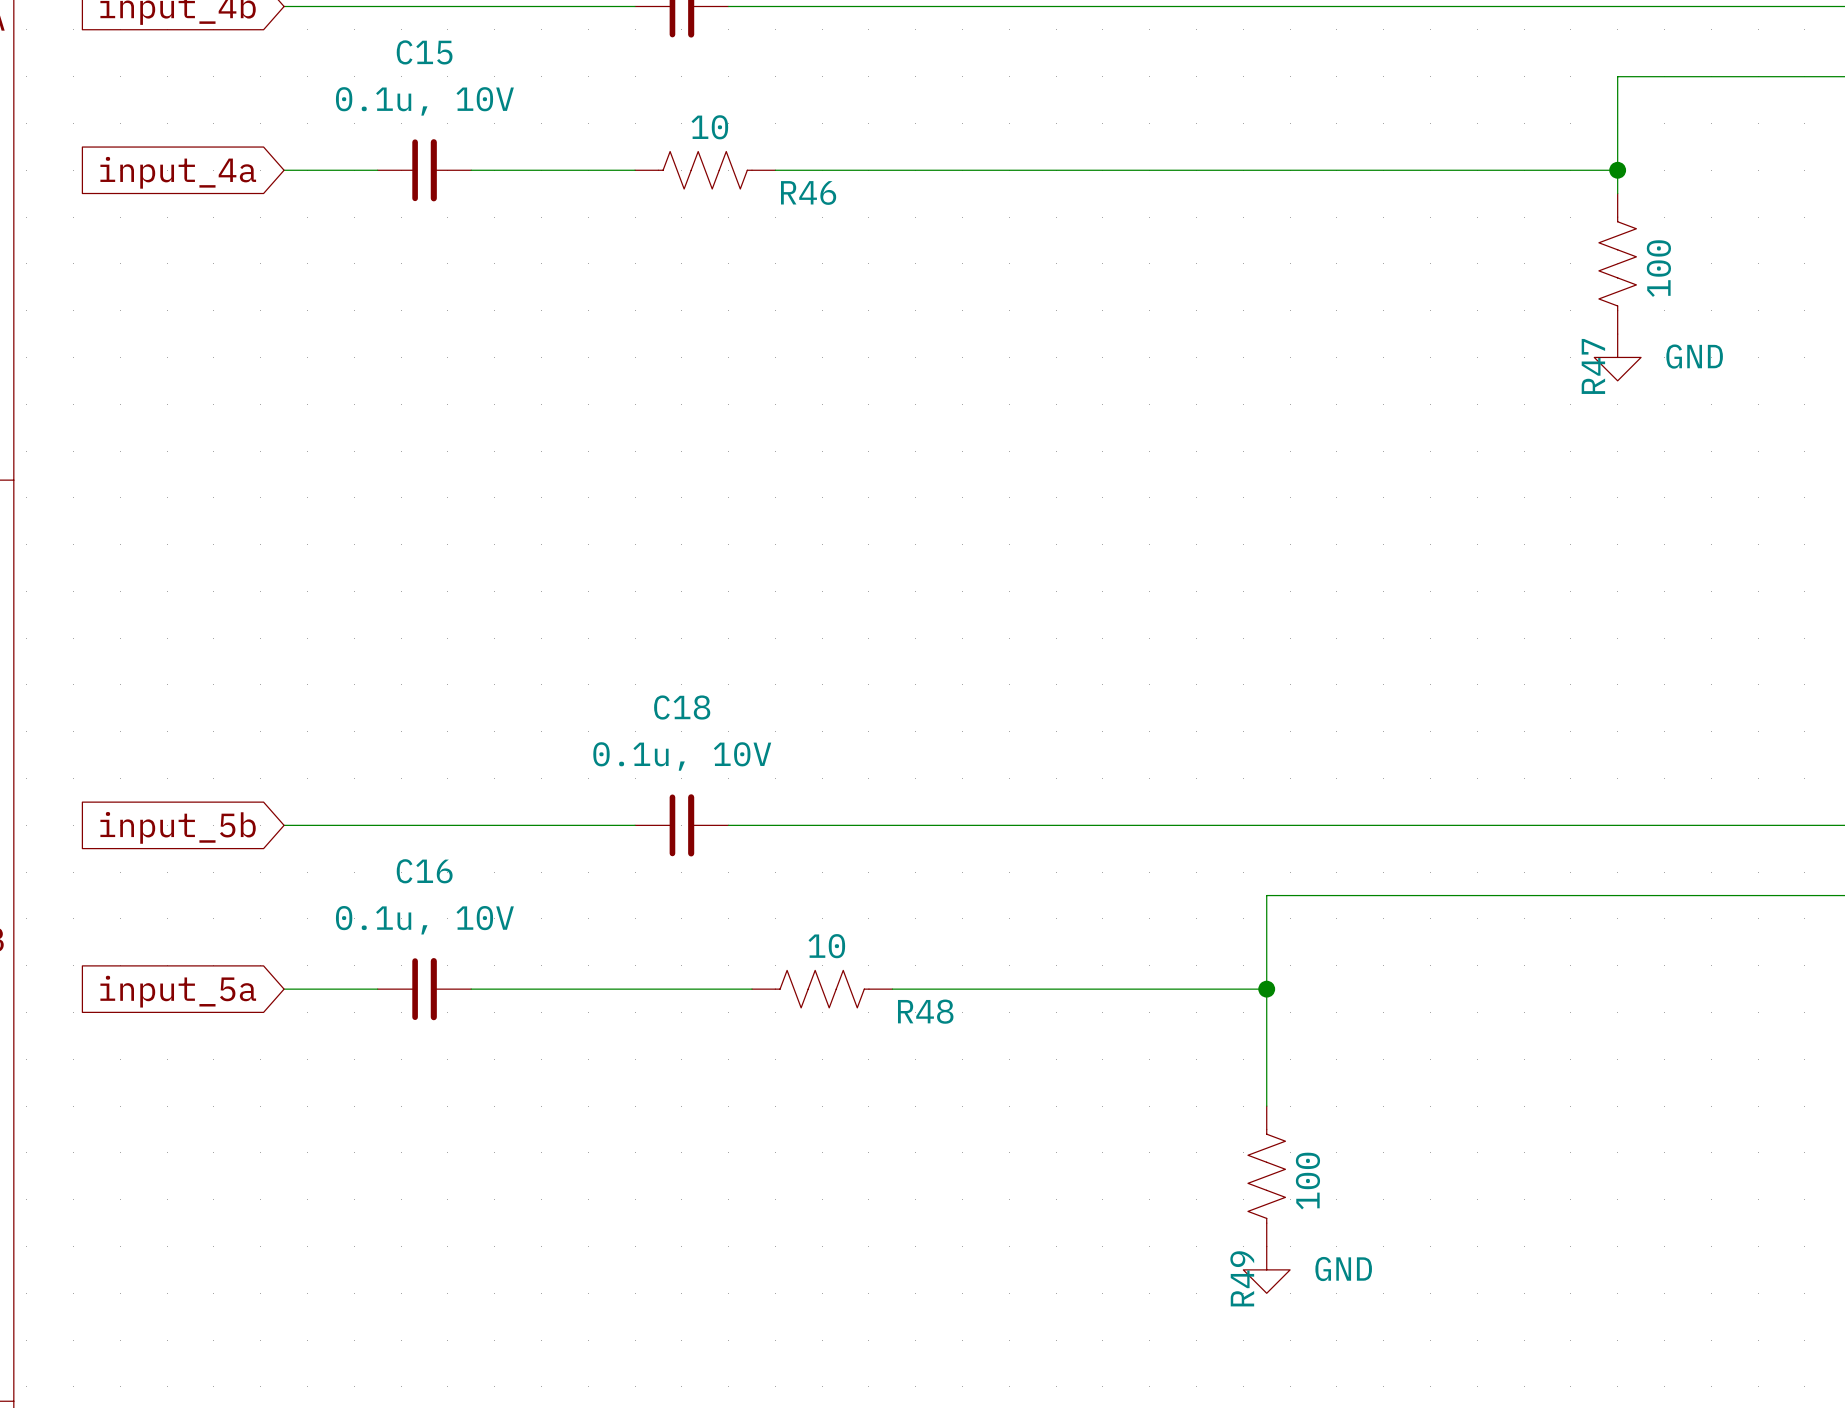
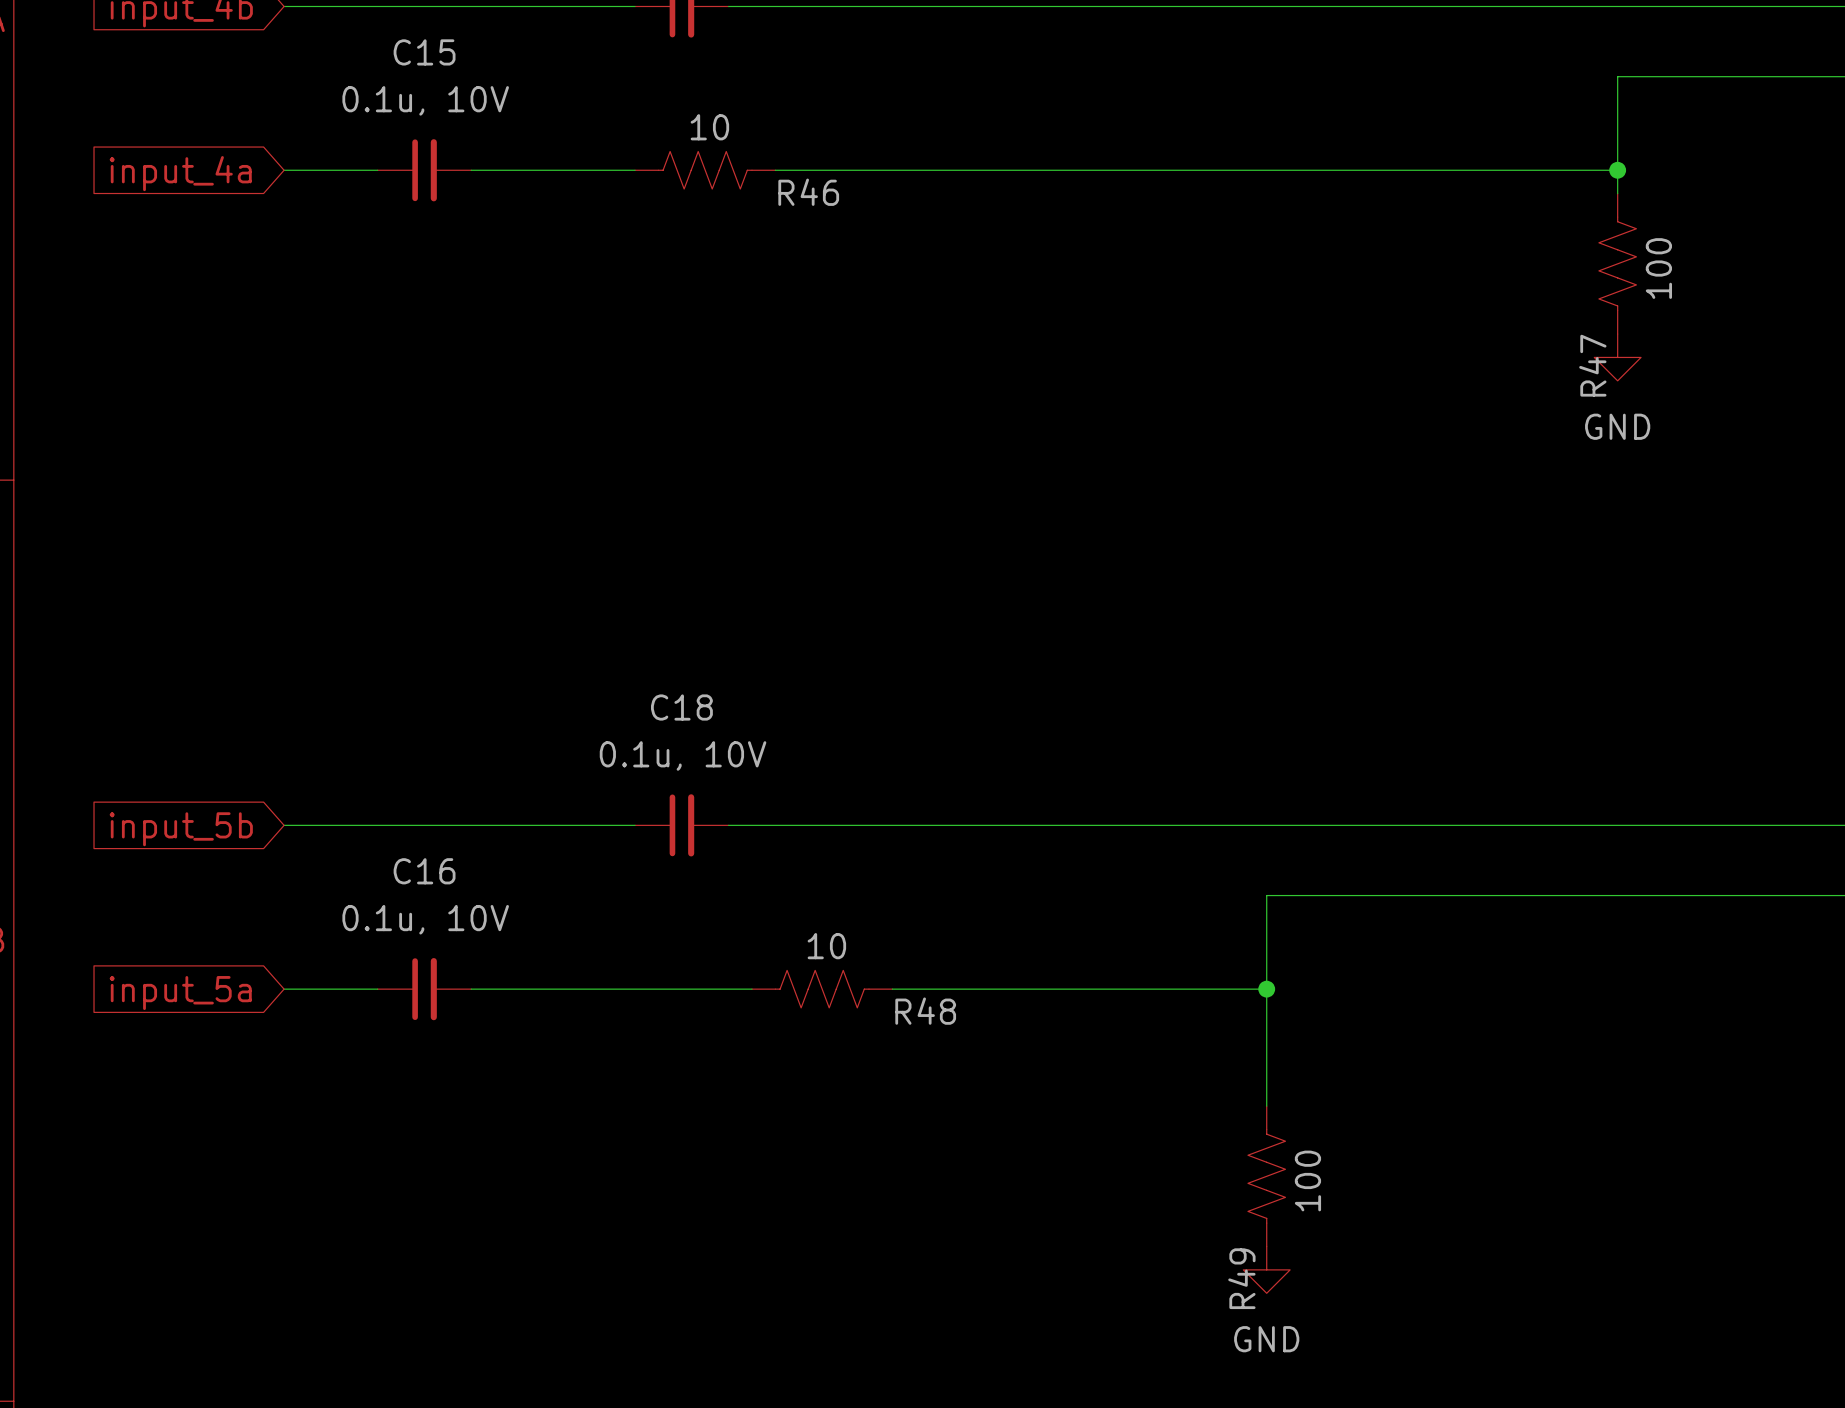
power symbol text position: GND (1694, 356) -> GND (1617, 426)
power symbol text position: GND (1343, 1269) -> GND (1266, 1339)

